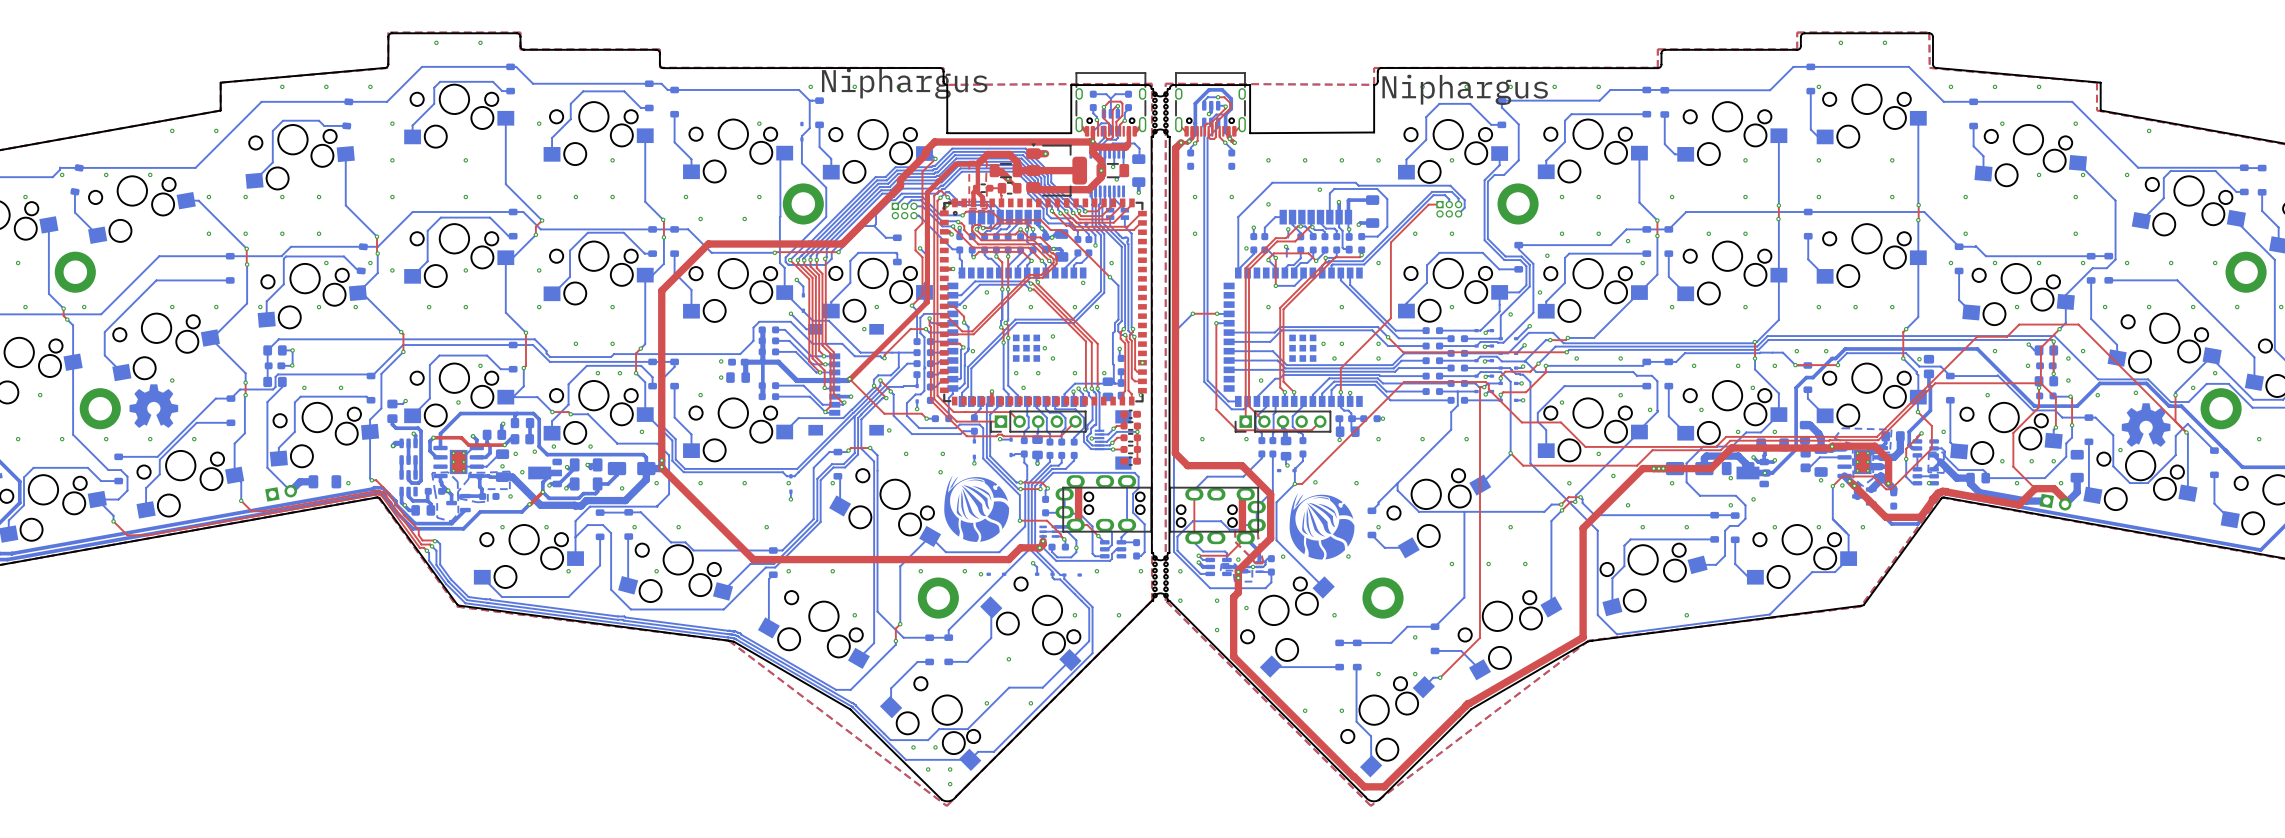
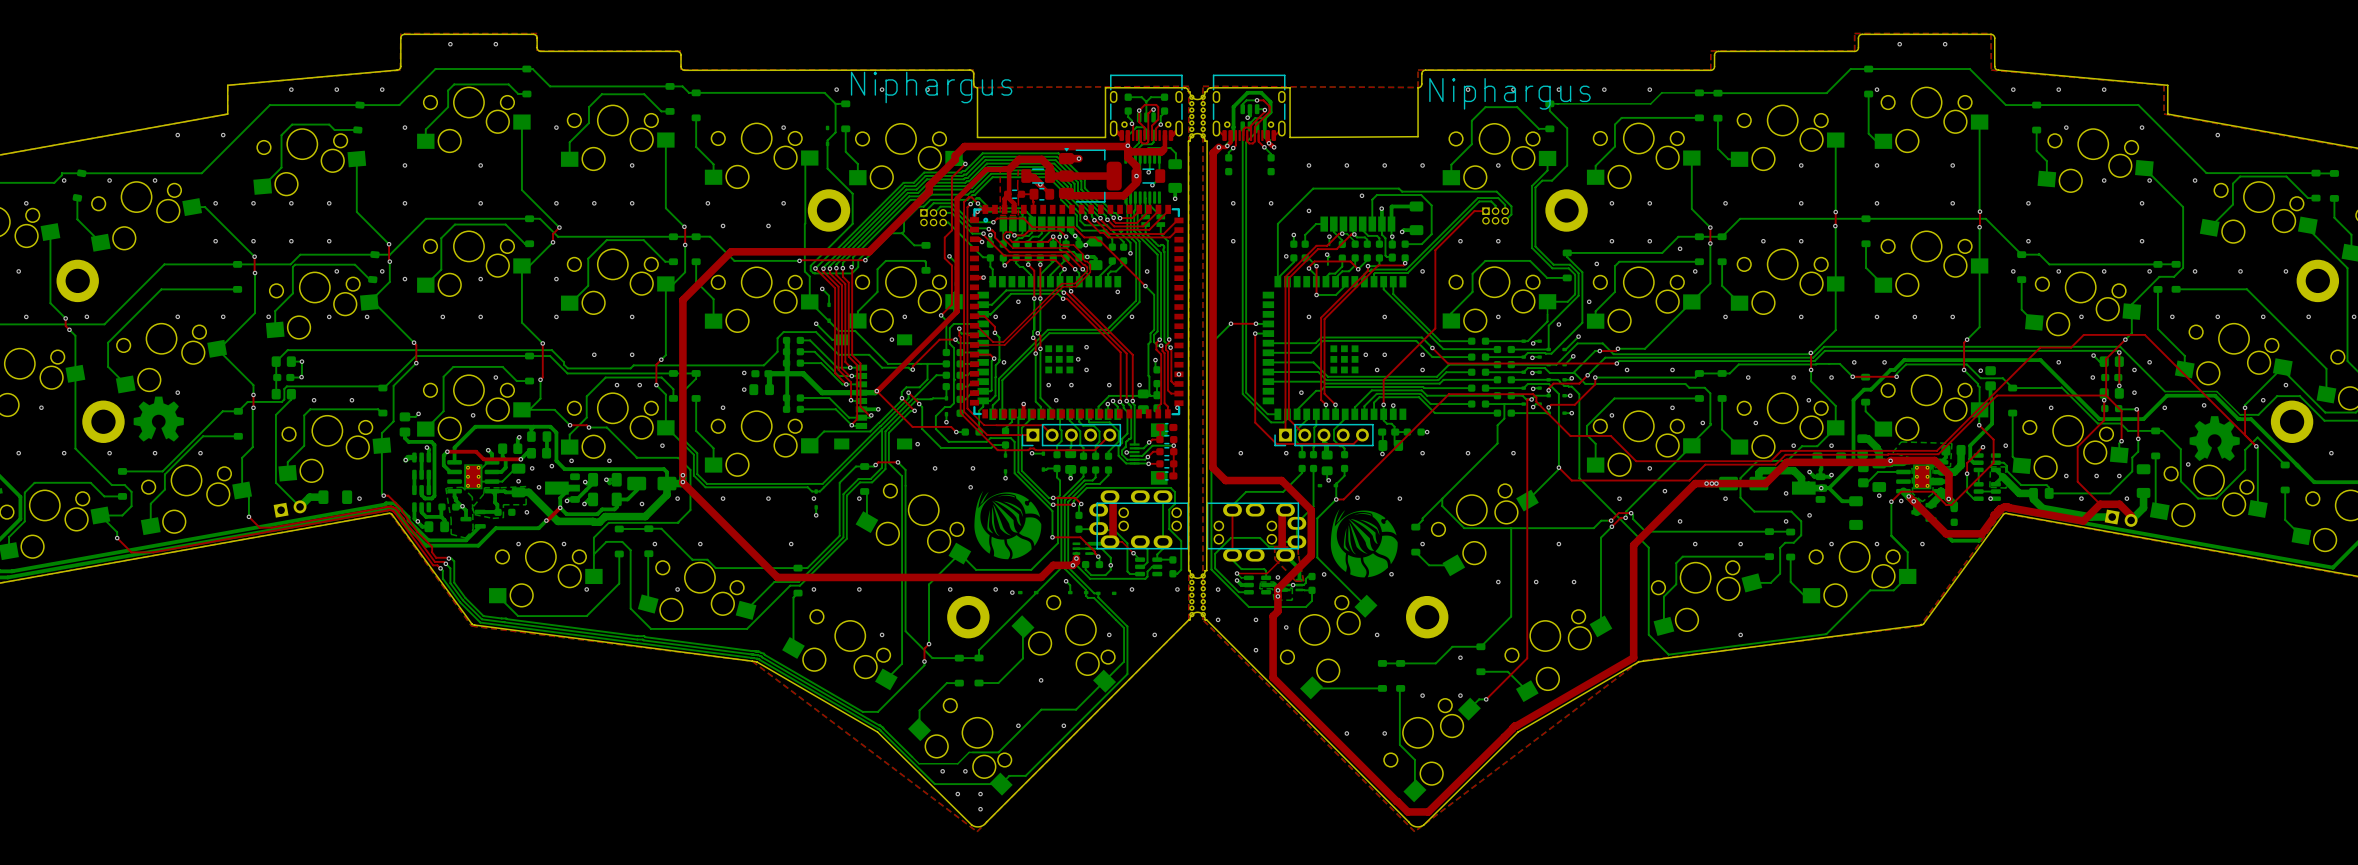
part rotation: 0° (1738, 468) -> 90° clockwise (1856, 513)
part position: (1738, 468) -> (1856, 513)
bottom track: none -> (1829, 488) (1842, 501) (1856, 501)

